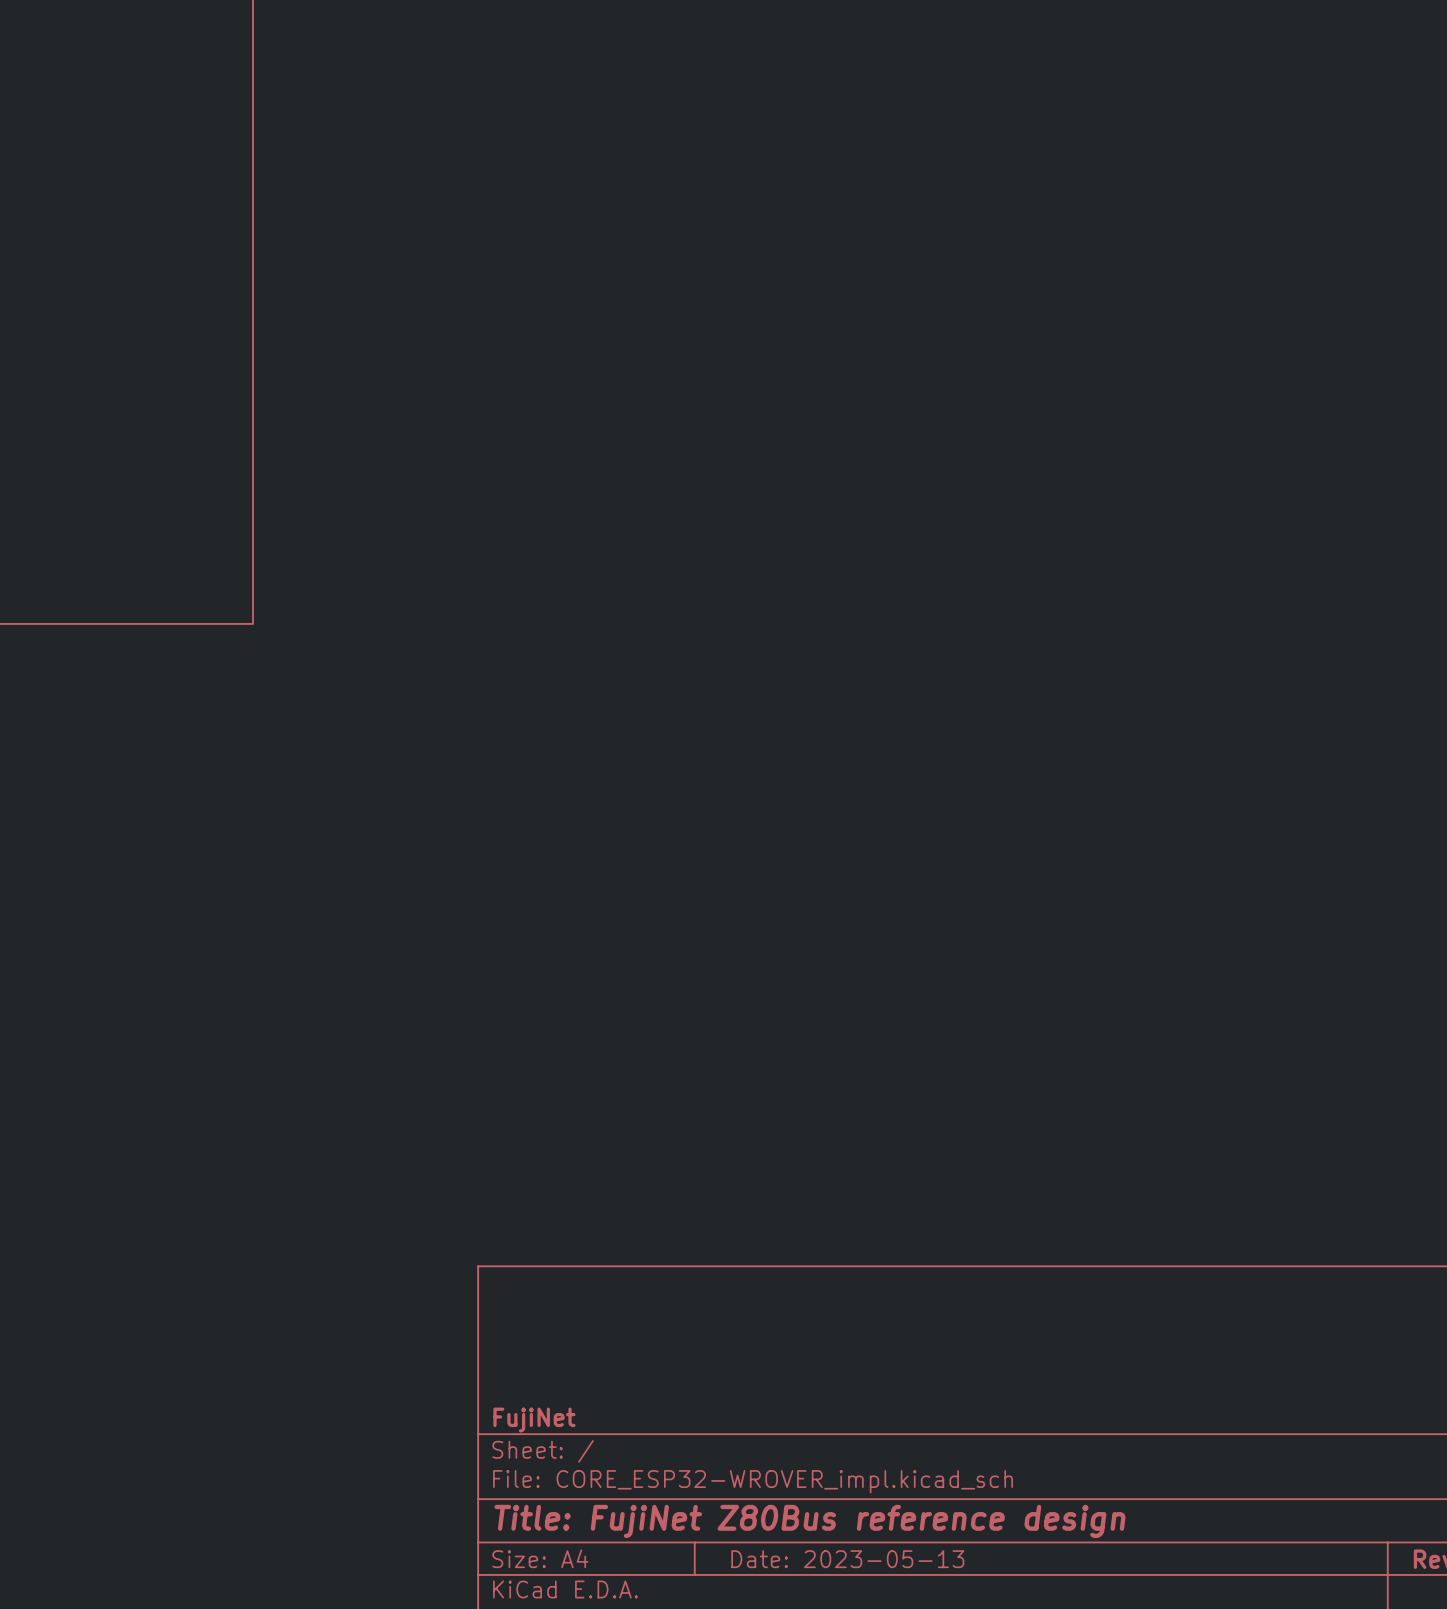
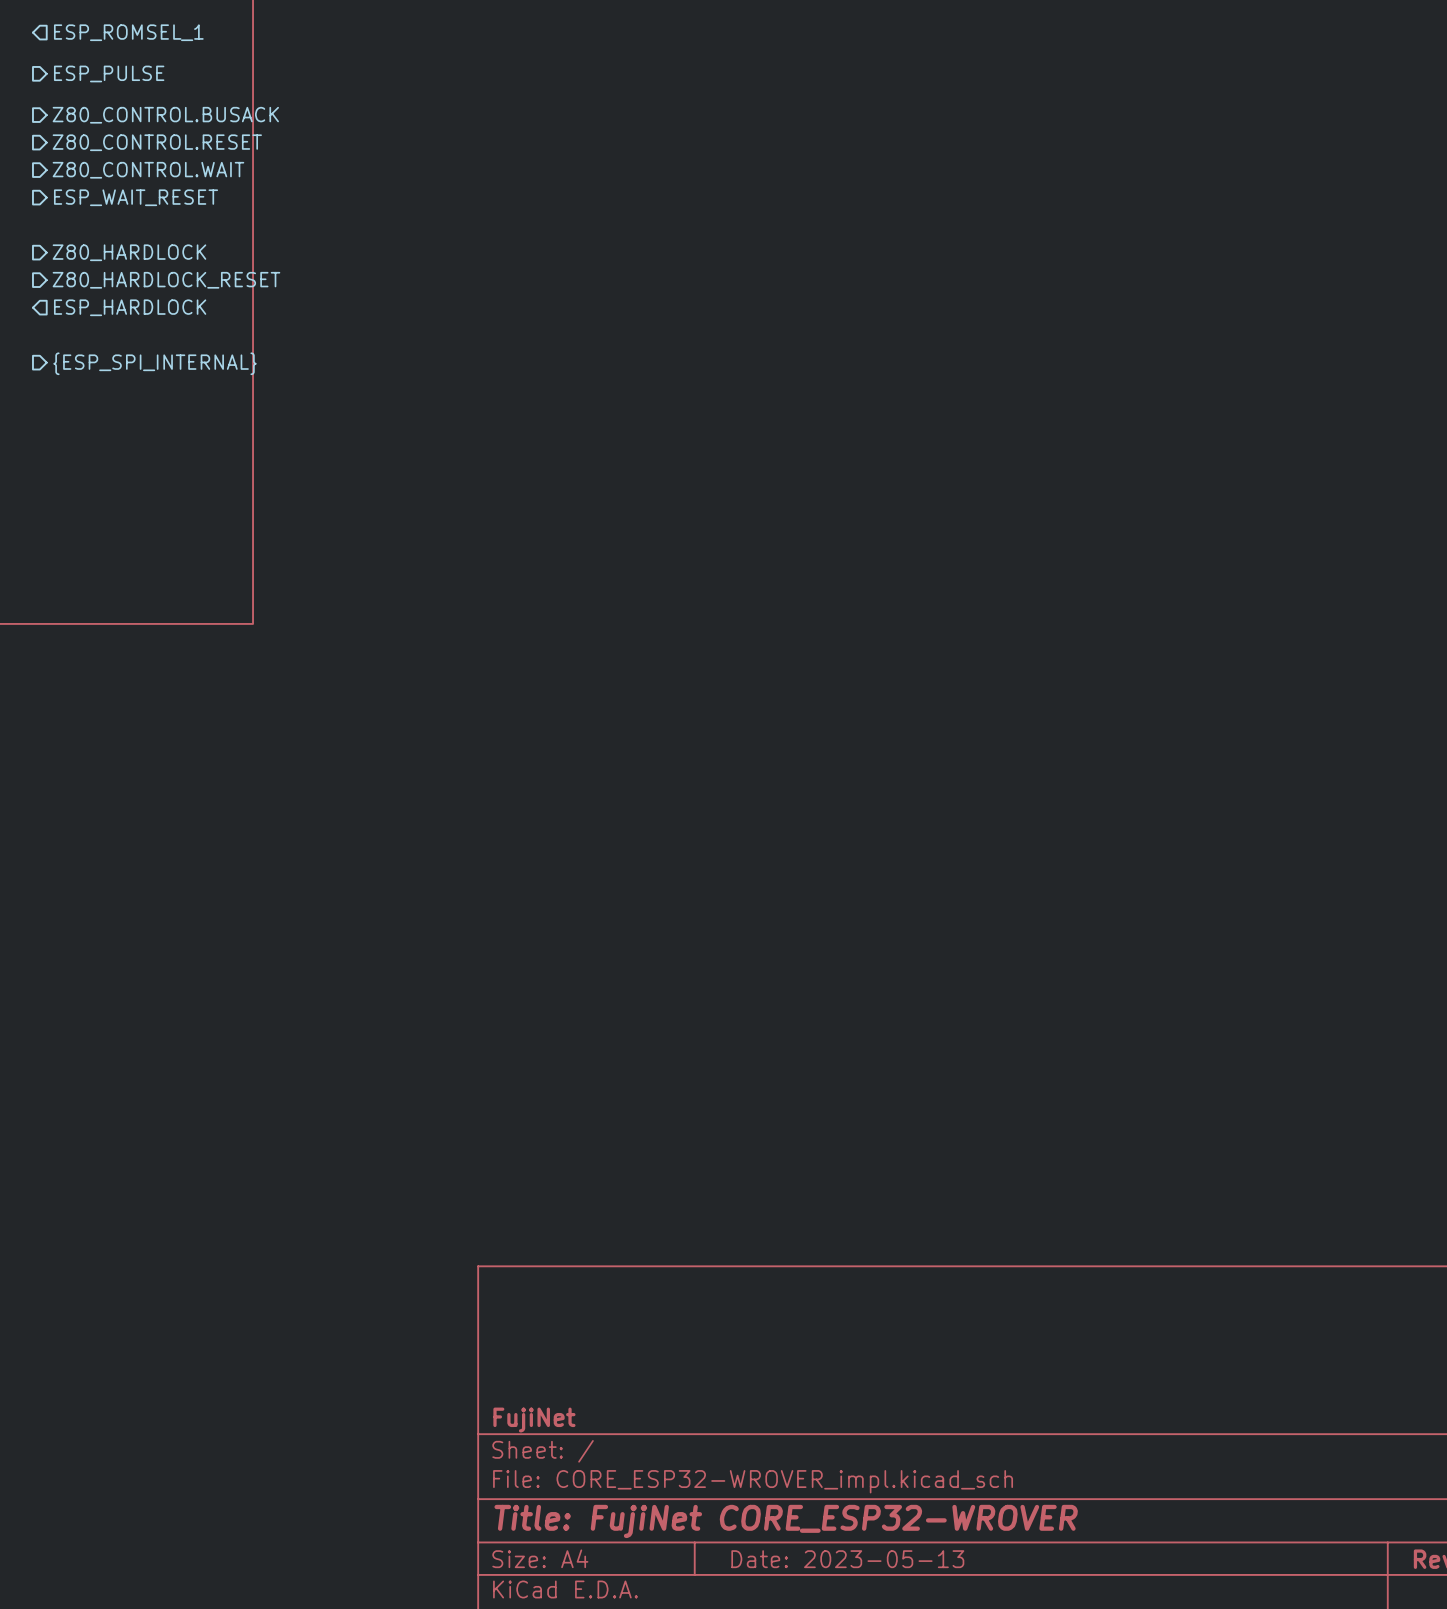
sheet pin: none -> ESP_ROMSEL_1 (128, 32)
sheet pin: none -> ESP_PULSE (109, 73)
sheet pin: none -> Z80_CONTROL.BUSACK (165, 115)
sheet pin: none -> Z80_CONTROL.RESET (157, 142)
sheet pin: none -> Z80_CONTROL.WAIT (148, 170)
sheet pin: none -> ESP_WAIT_RESET (136, 197)
sheet pin: none -> Z80_HARDLOCK (129, 252)
sheet pin: none -> Z80_HARDLOCK_RESET (166, 280)
sheet pin: none -> ESP_HARDLOCK (130, 307)
sheet pin: none -> {ESP_SPI_INTERNAL} (155, 363)
title block: Title: FujiNet Z80Bus reference design (810, 1521) -> Title: FujiNet CORE_ESP32-WROVER (786, 1521)

